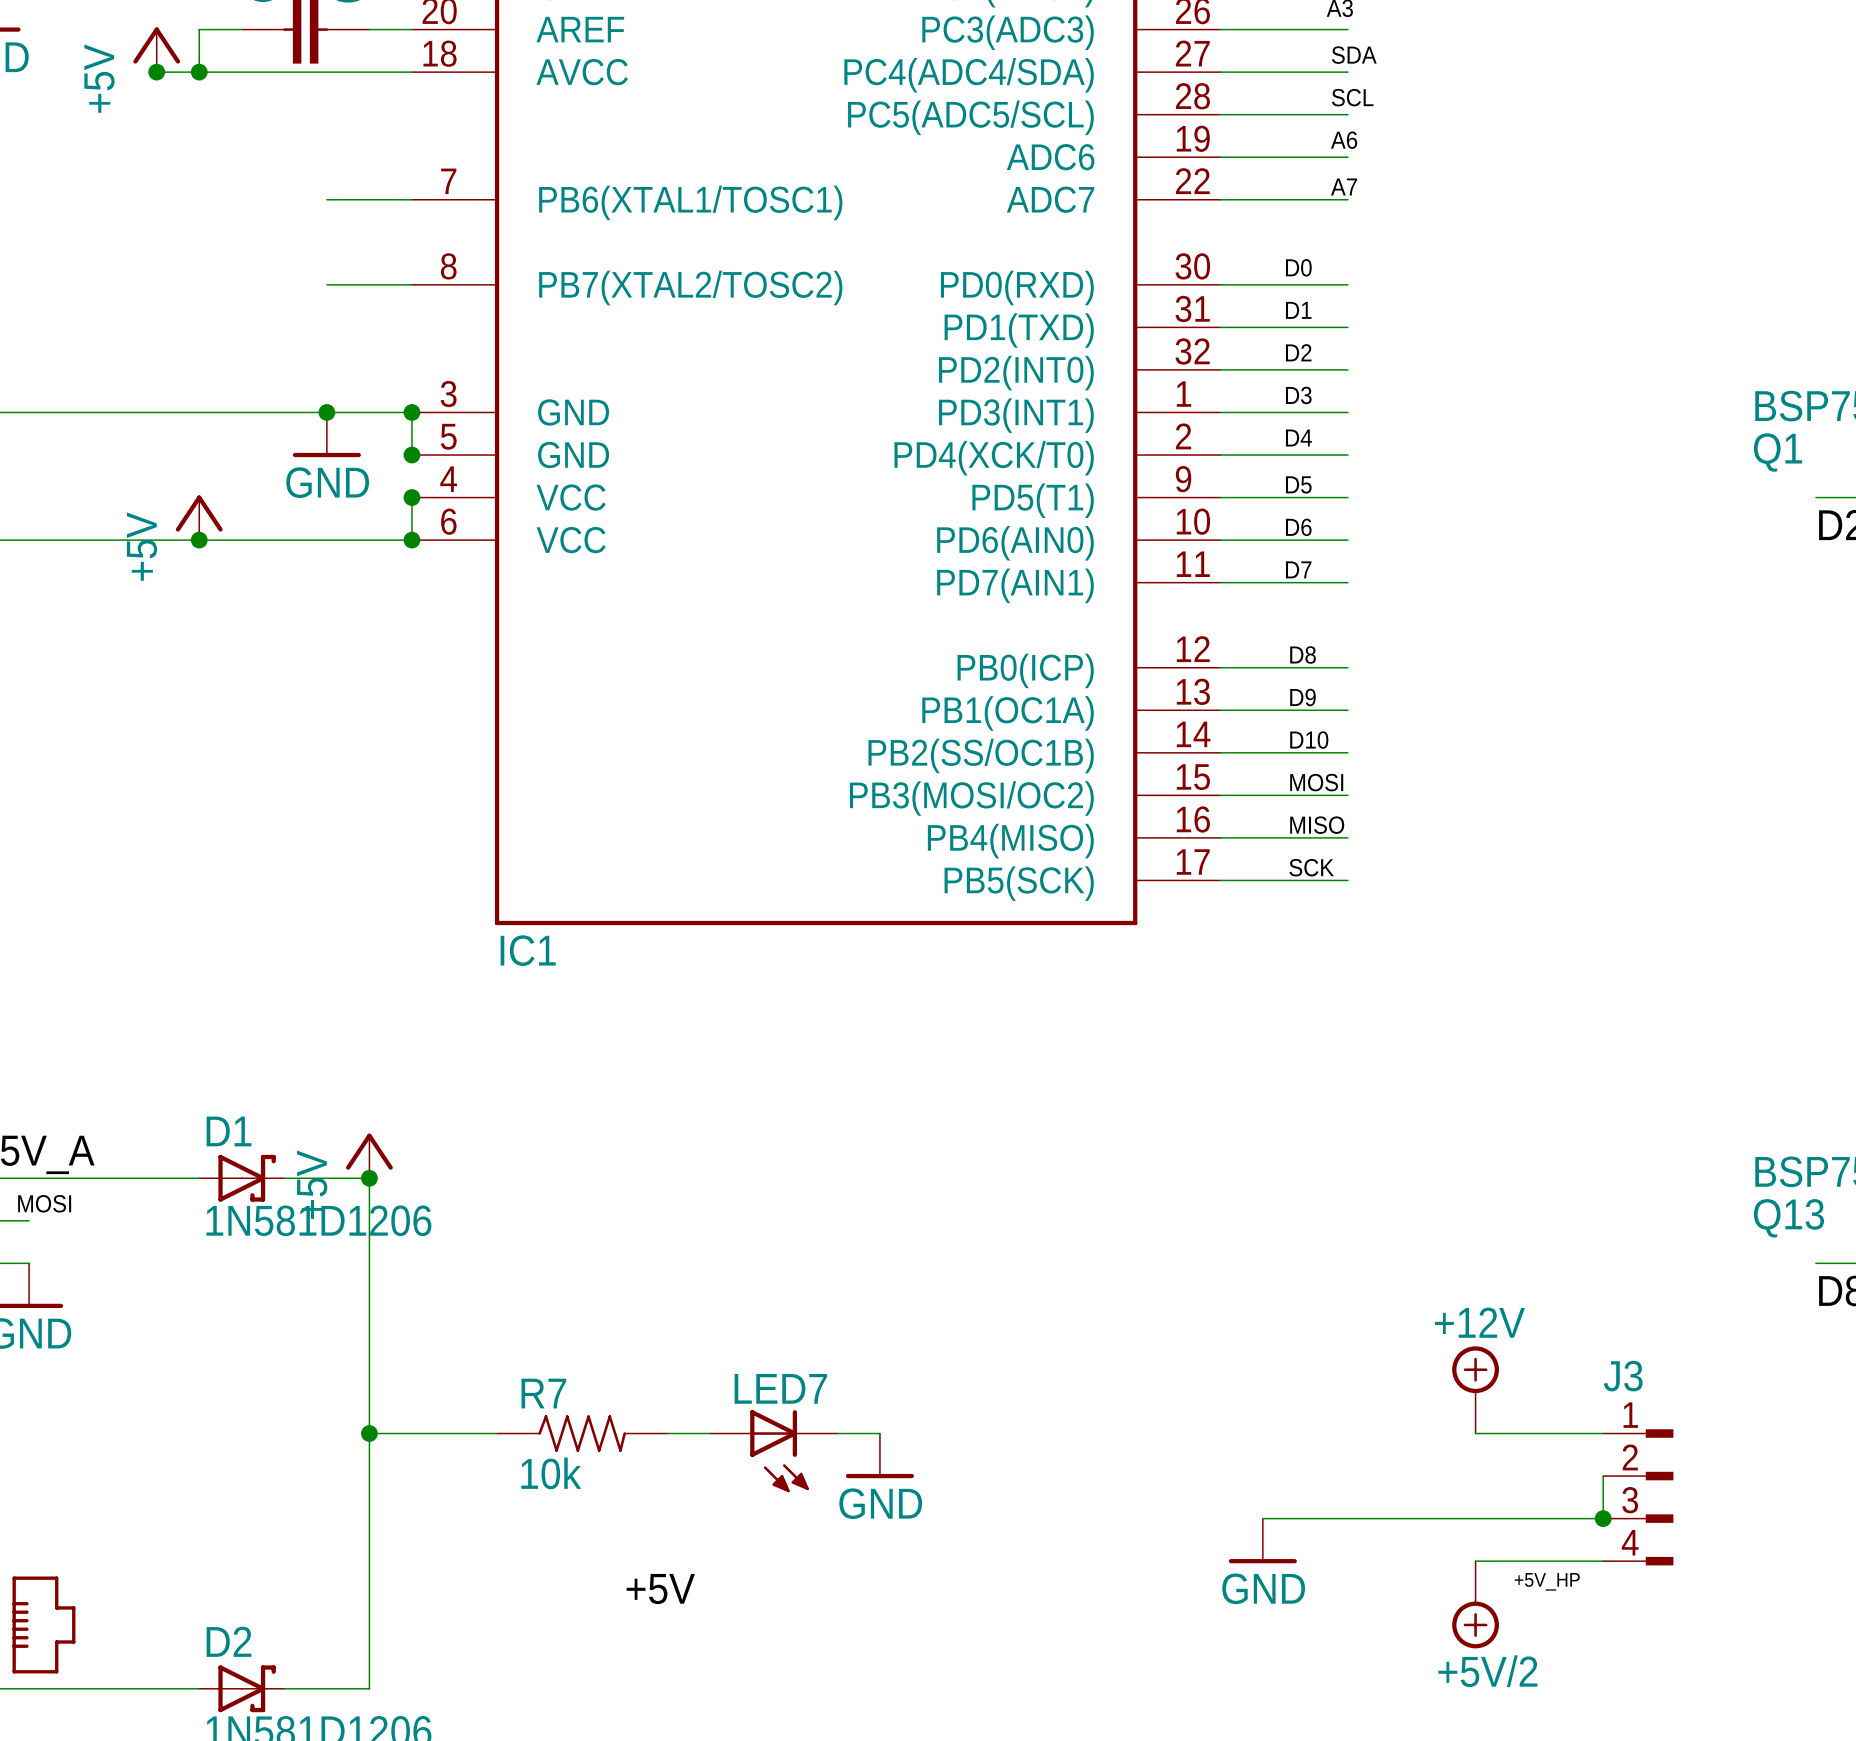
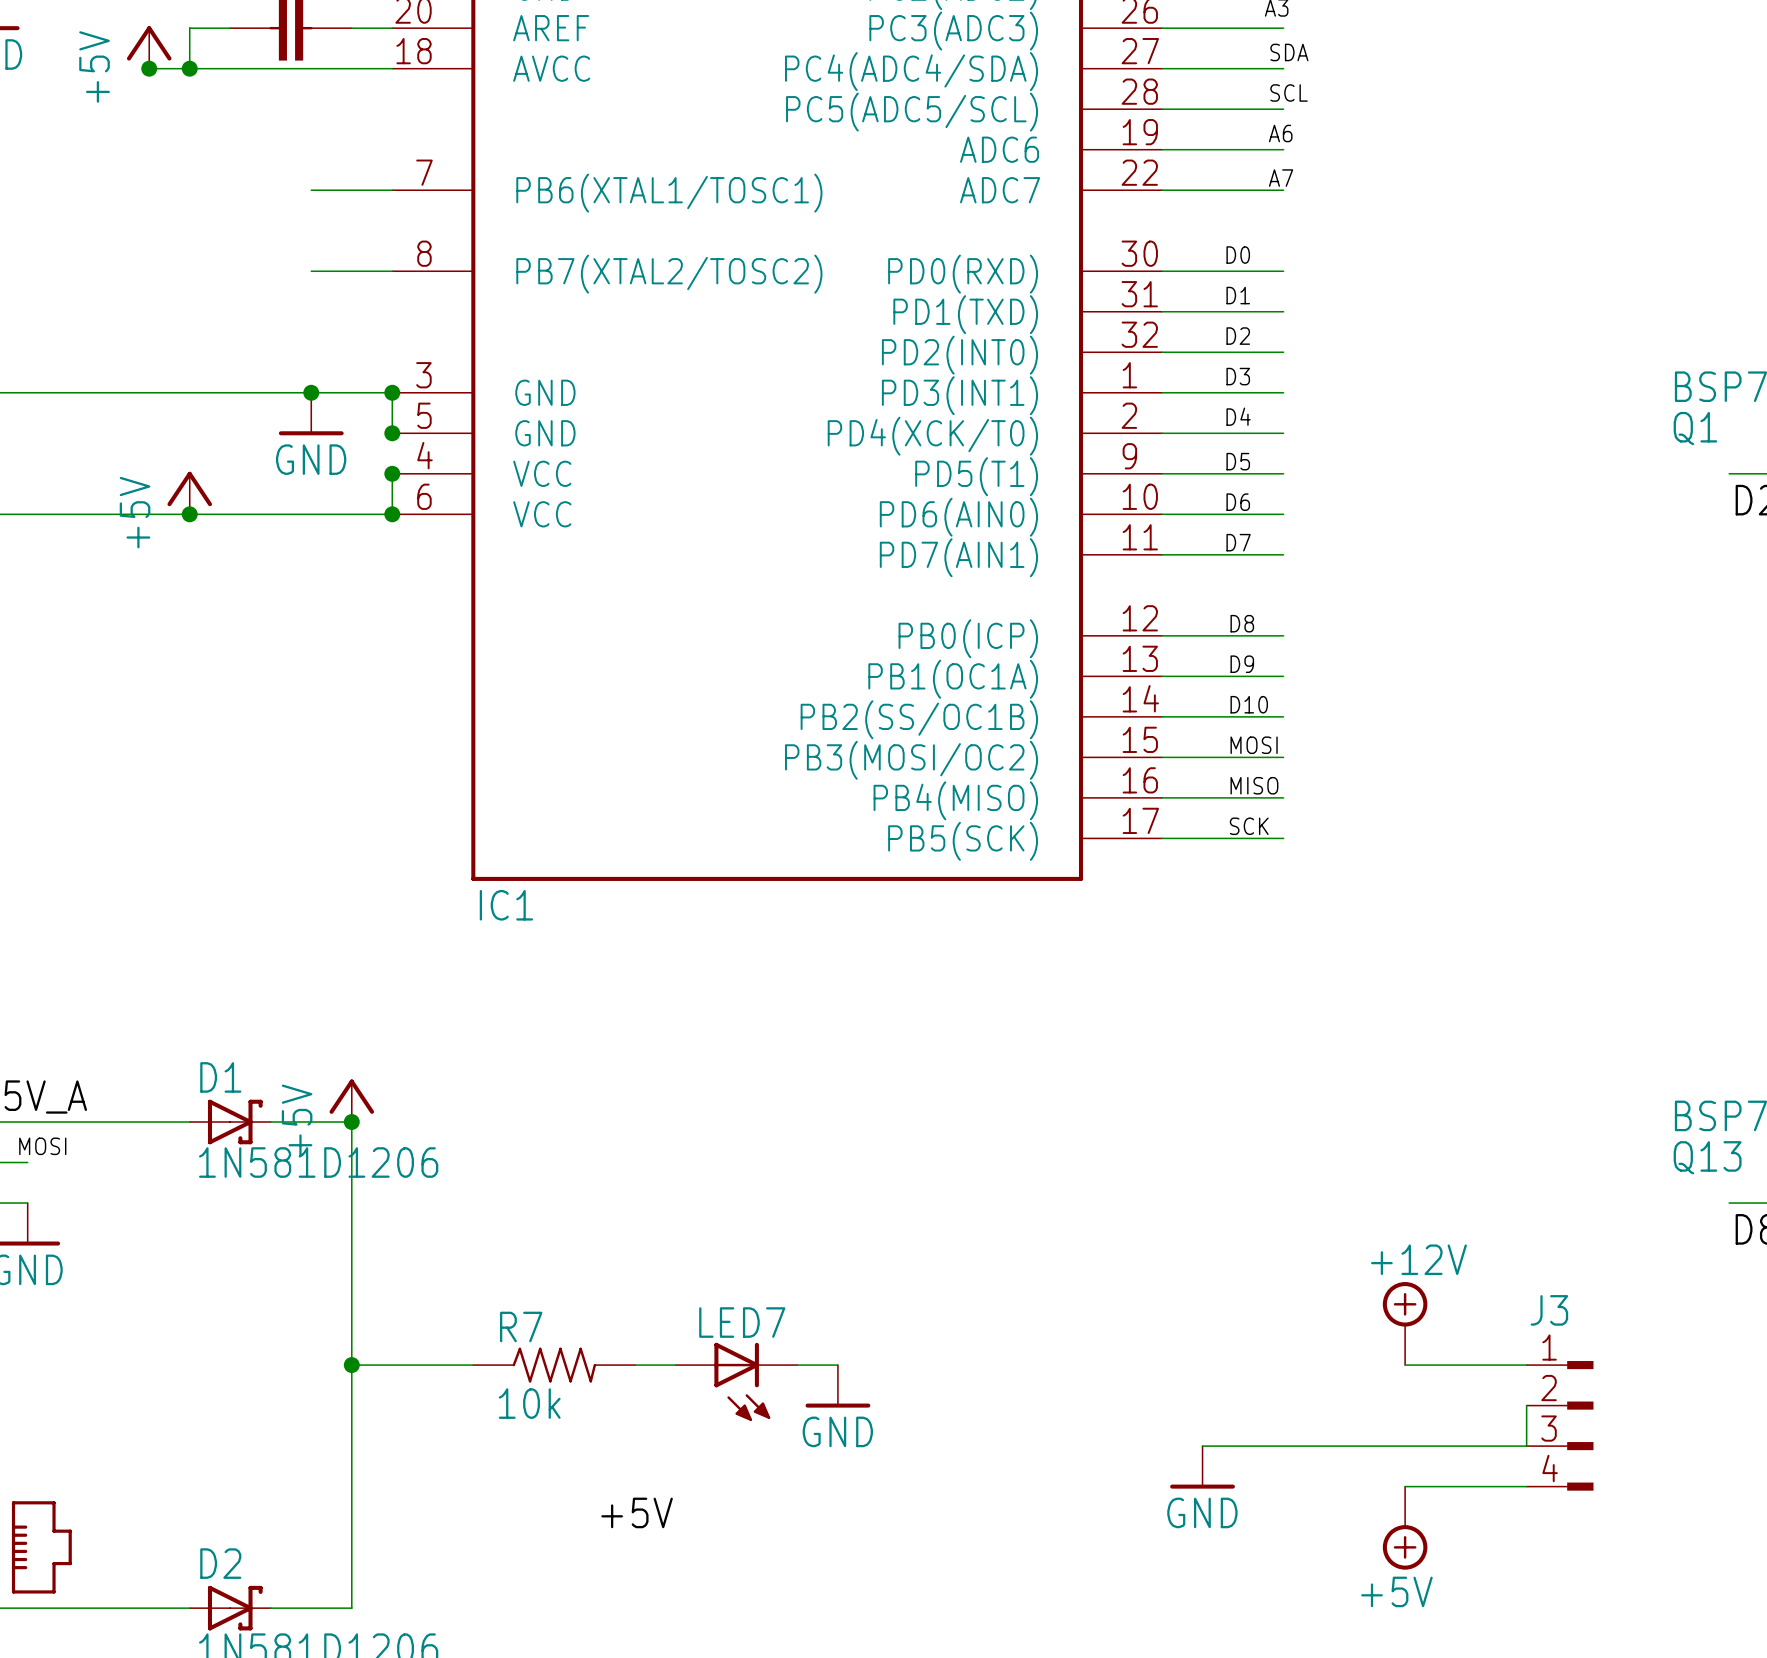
junction: (1603, 1518) -> none
label: +5V_HP (1547, 1581) -> none
power symbol: +5V/2 (1475, 1604) -> +5V (1405, 1528)

